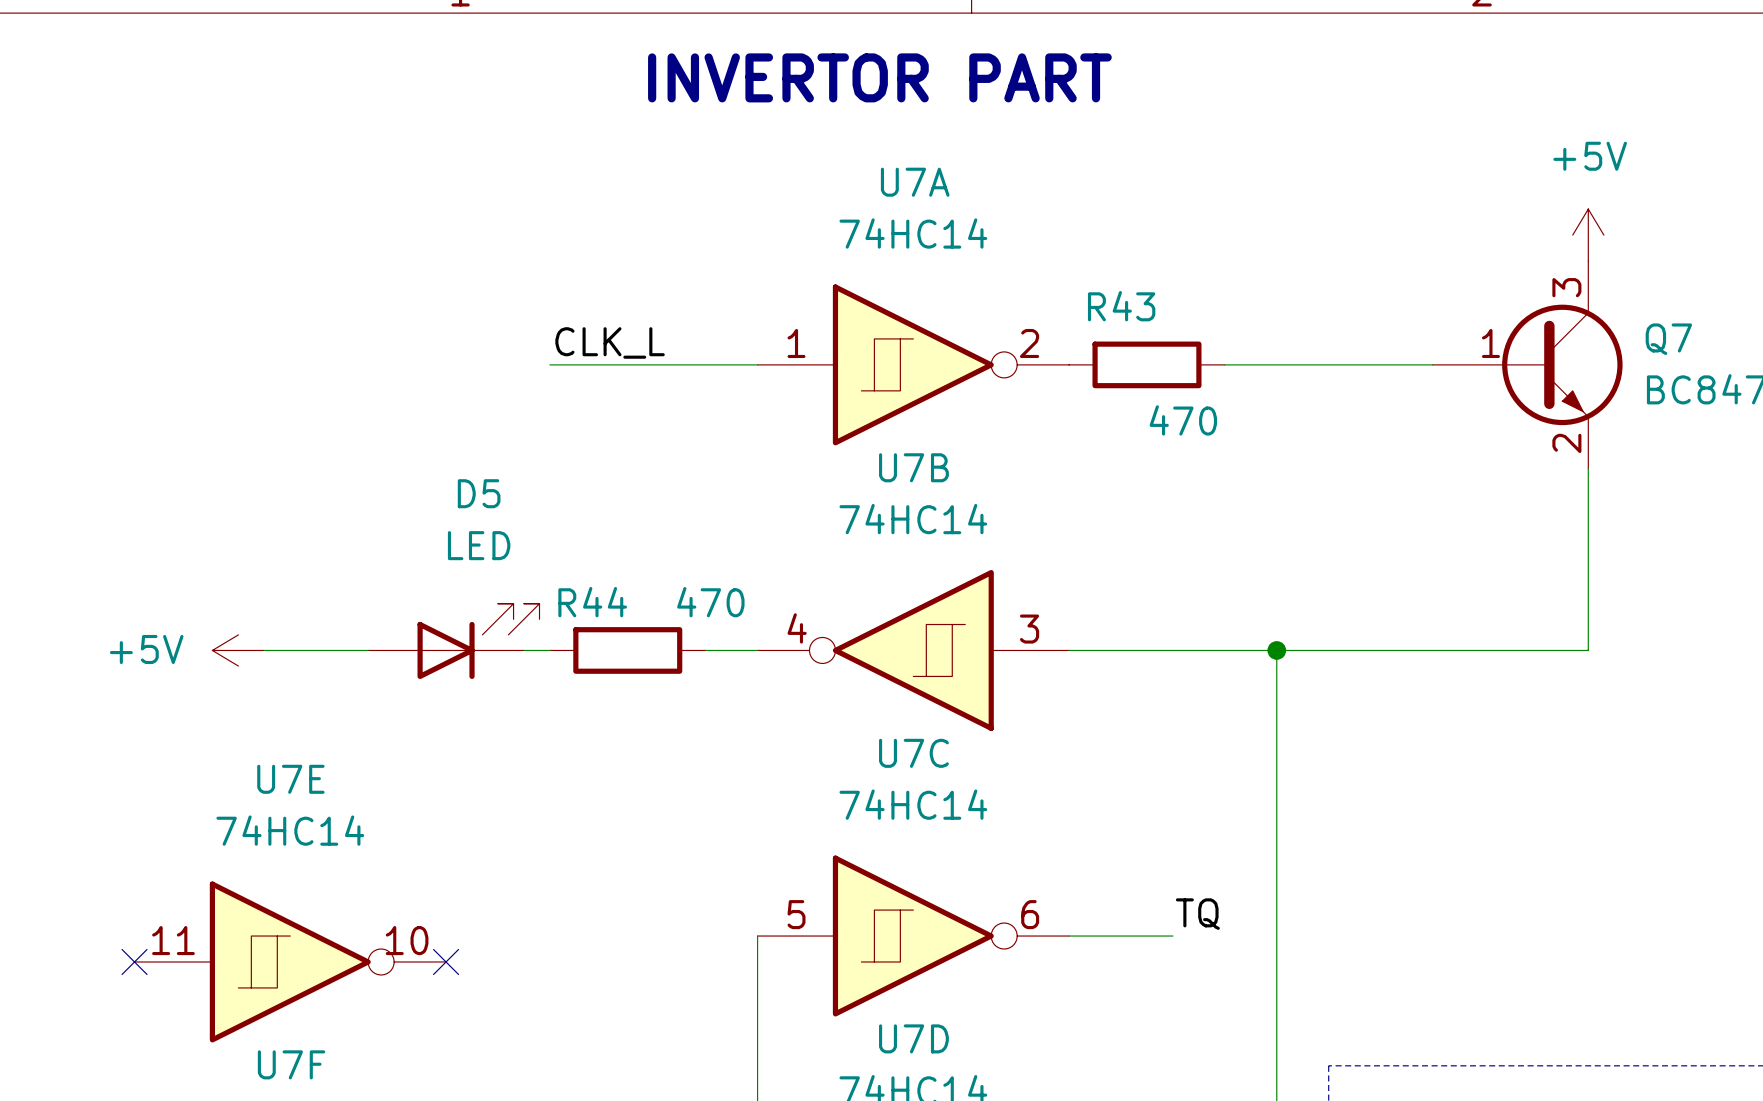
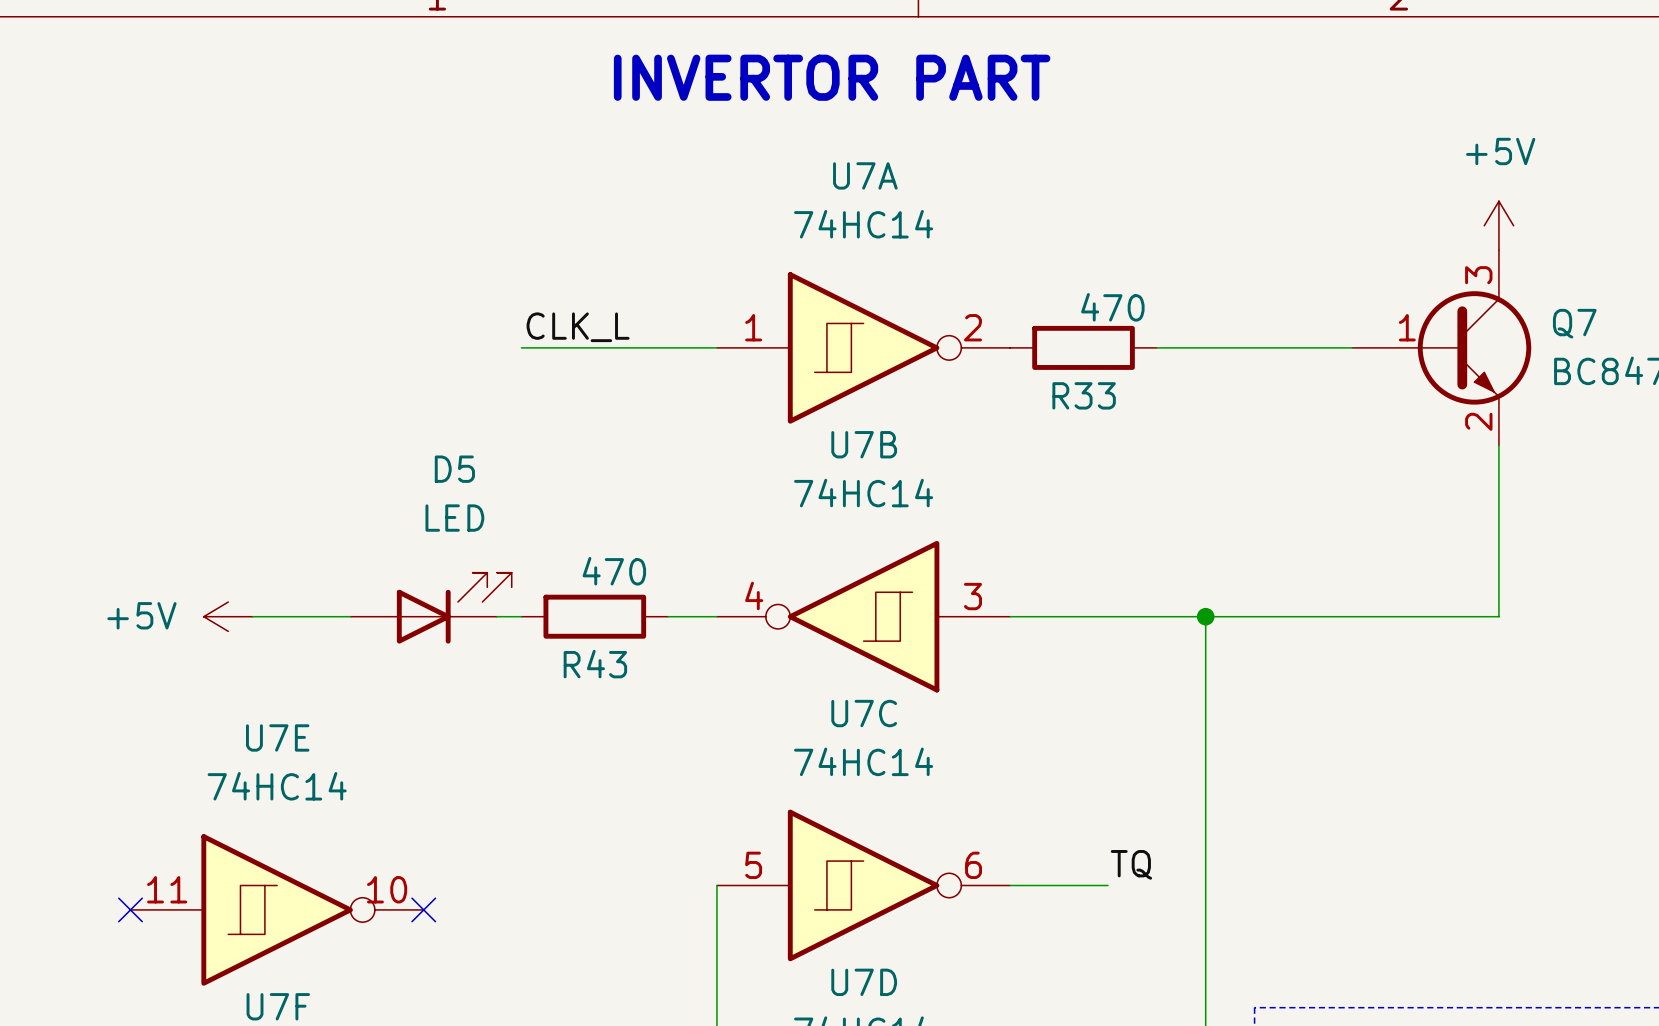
R43 name: R43 (1121, 306) -> R33 (1084, 395)
R43 value position: 470 (1183, 420) -> 470 (1112, 307)
R44 name: R44 (592, 602) -> R43 (595, 664)
R44 value position: 470 (710, 602) -> 470 (614, 571)

